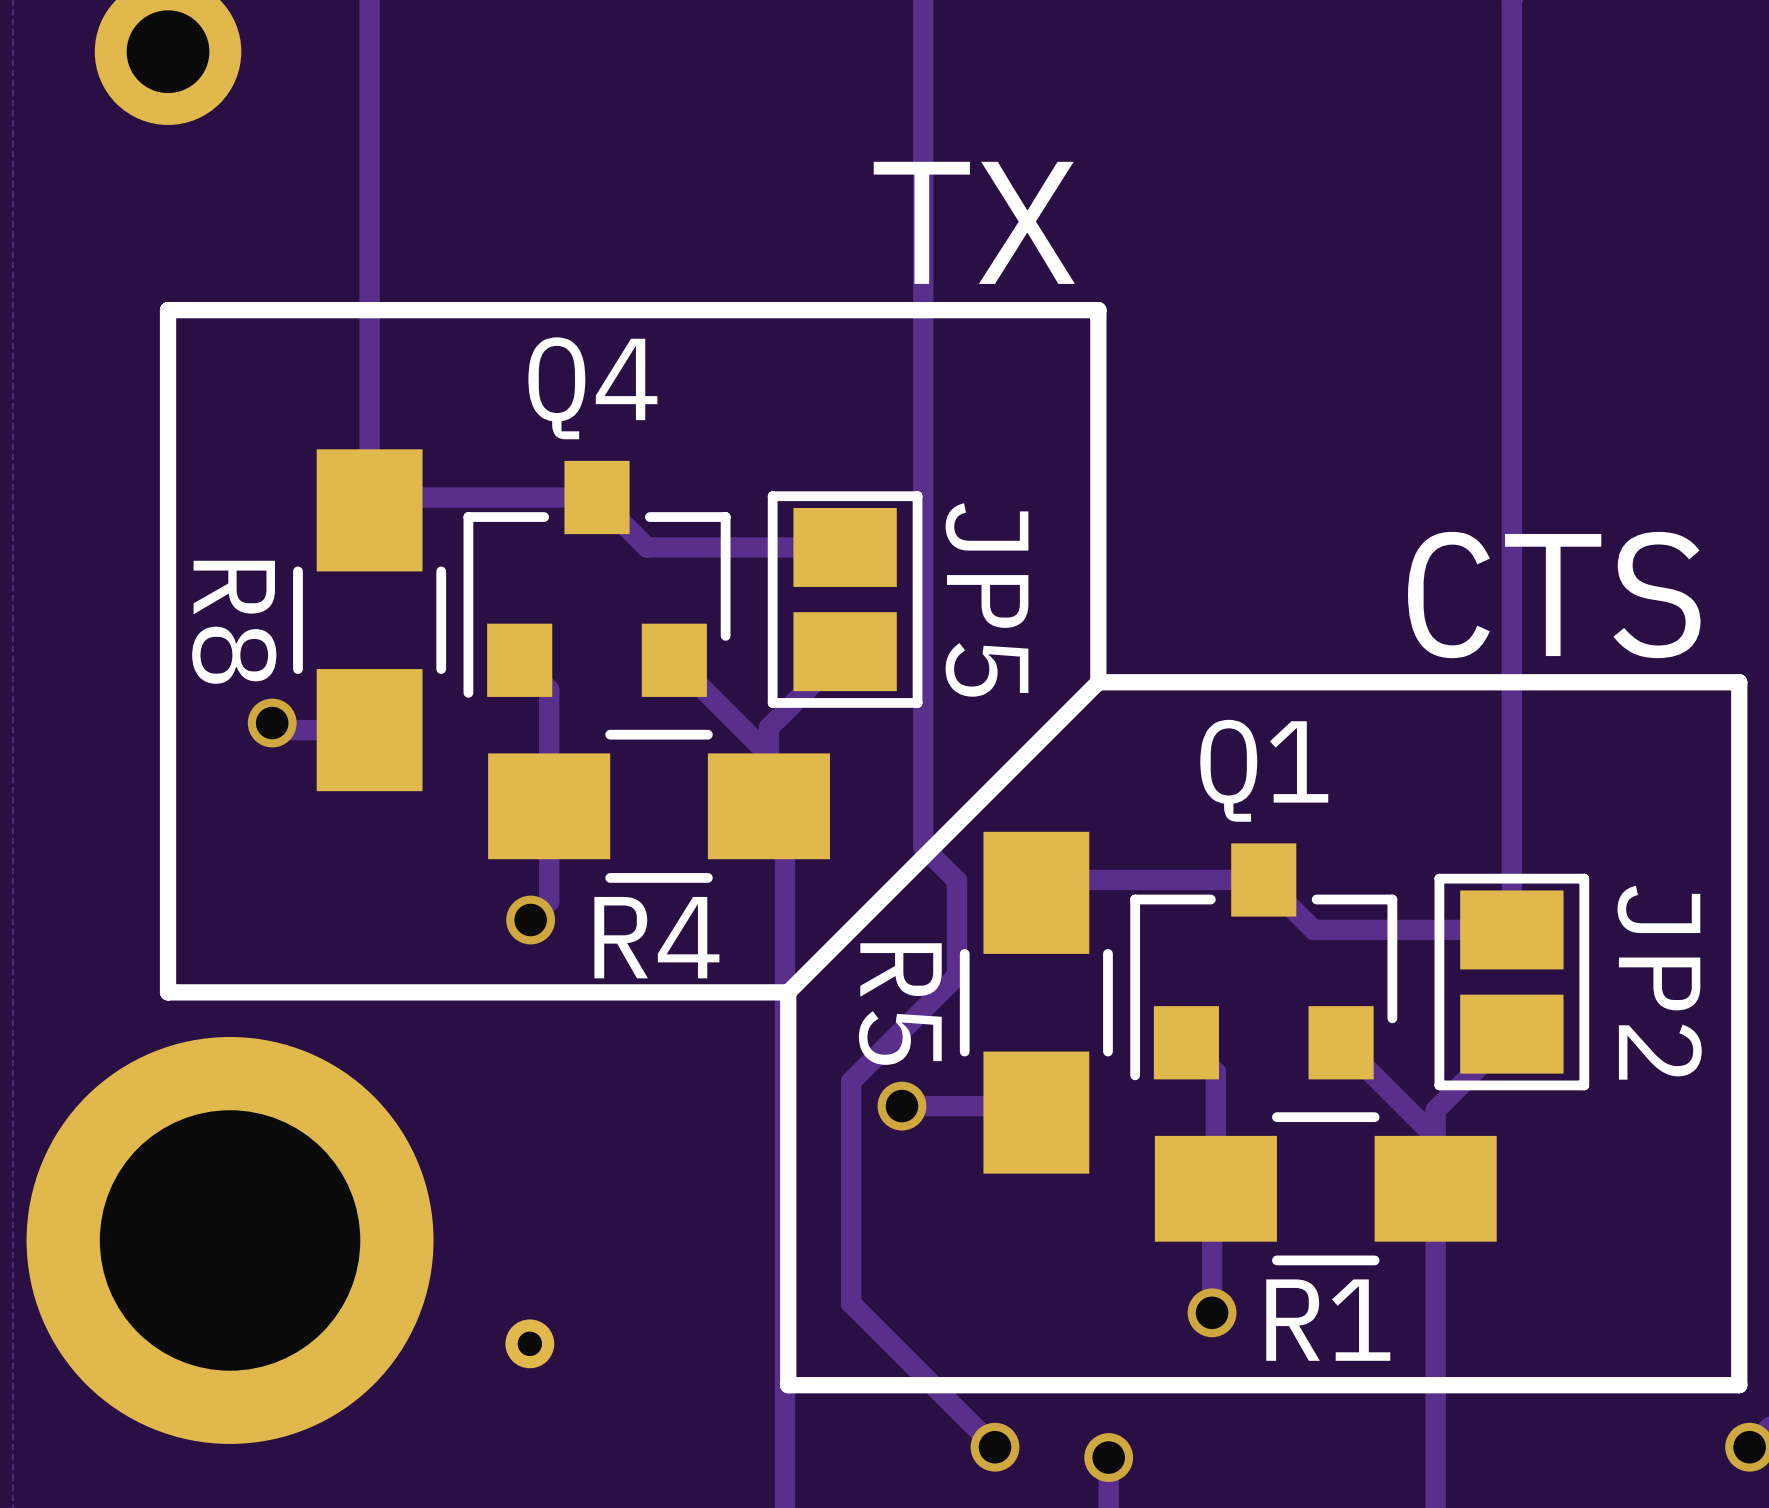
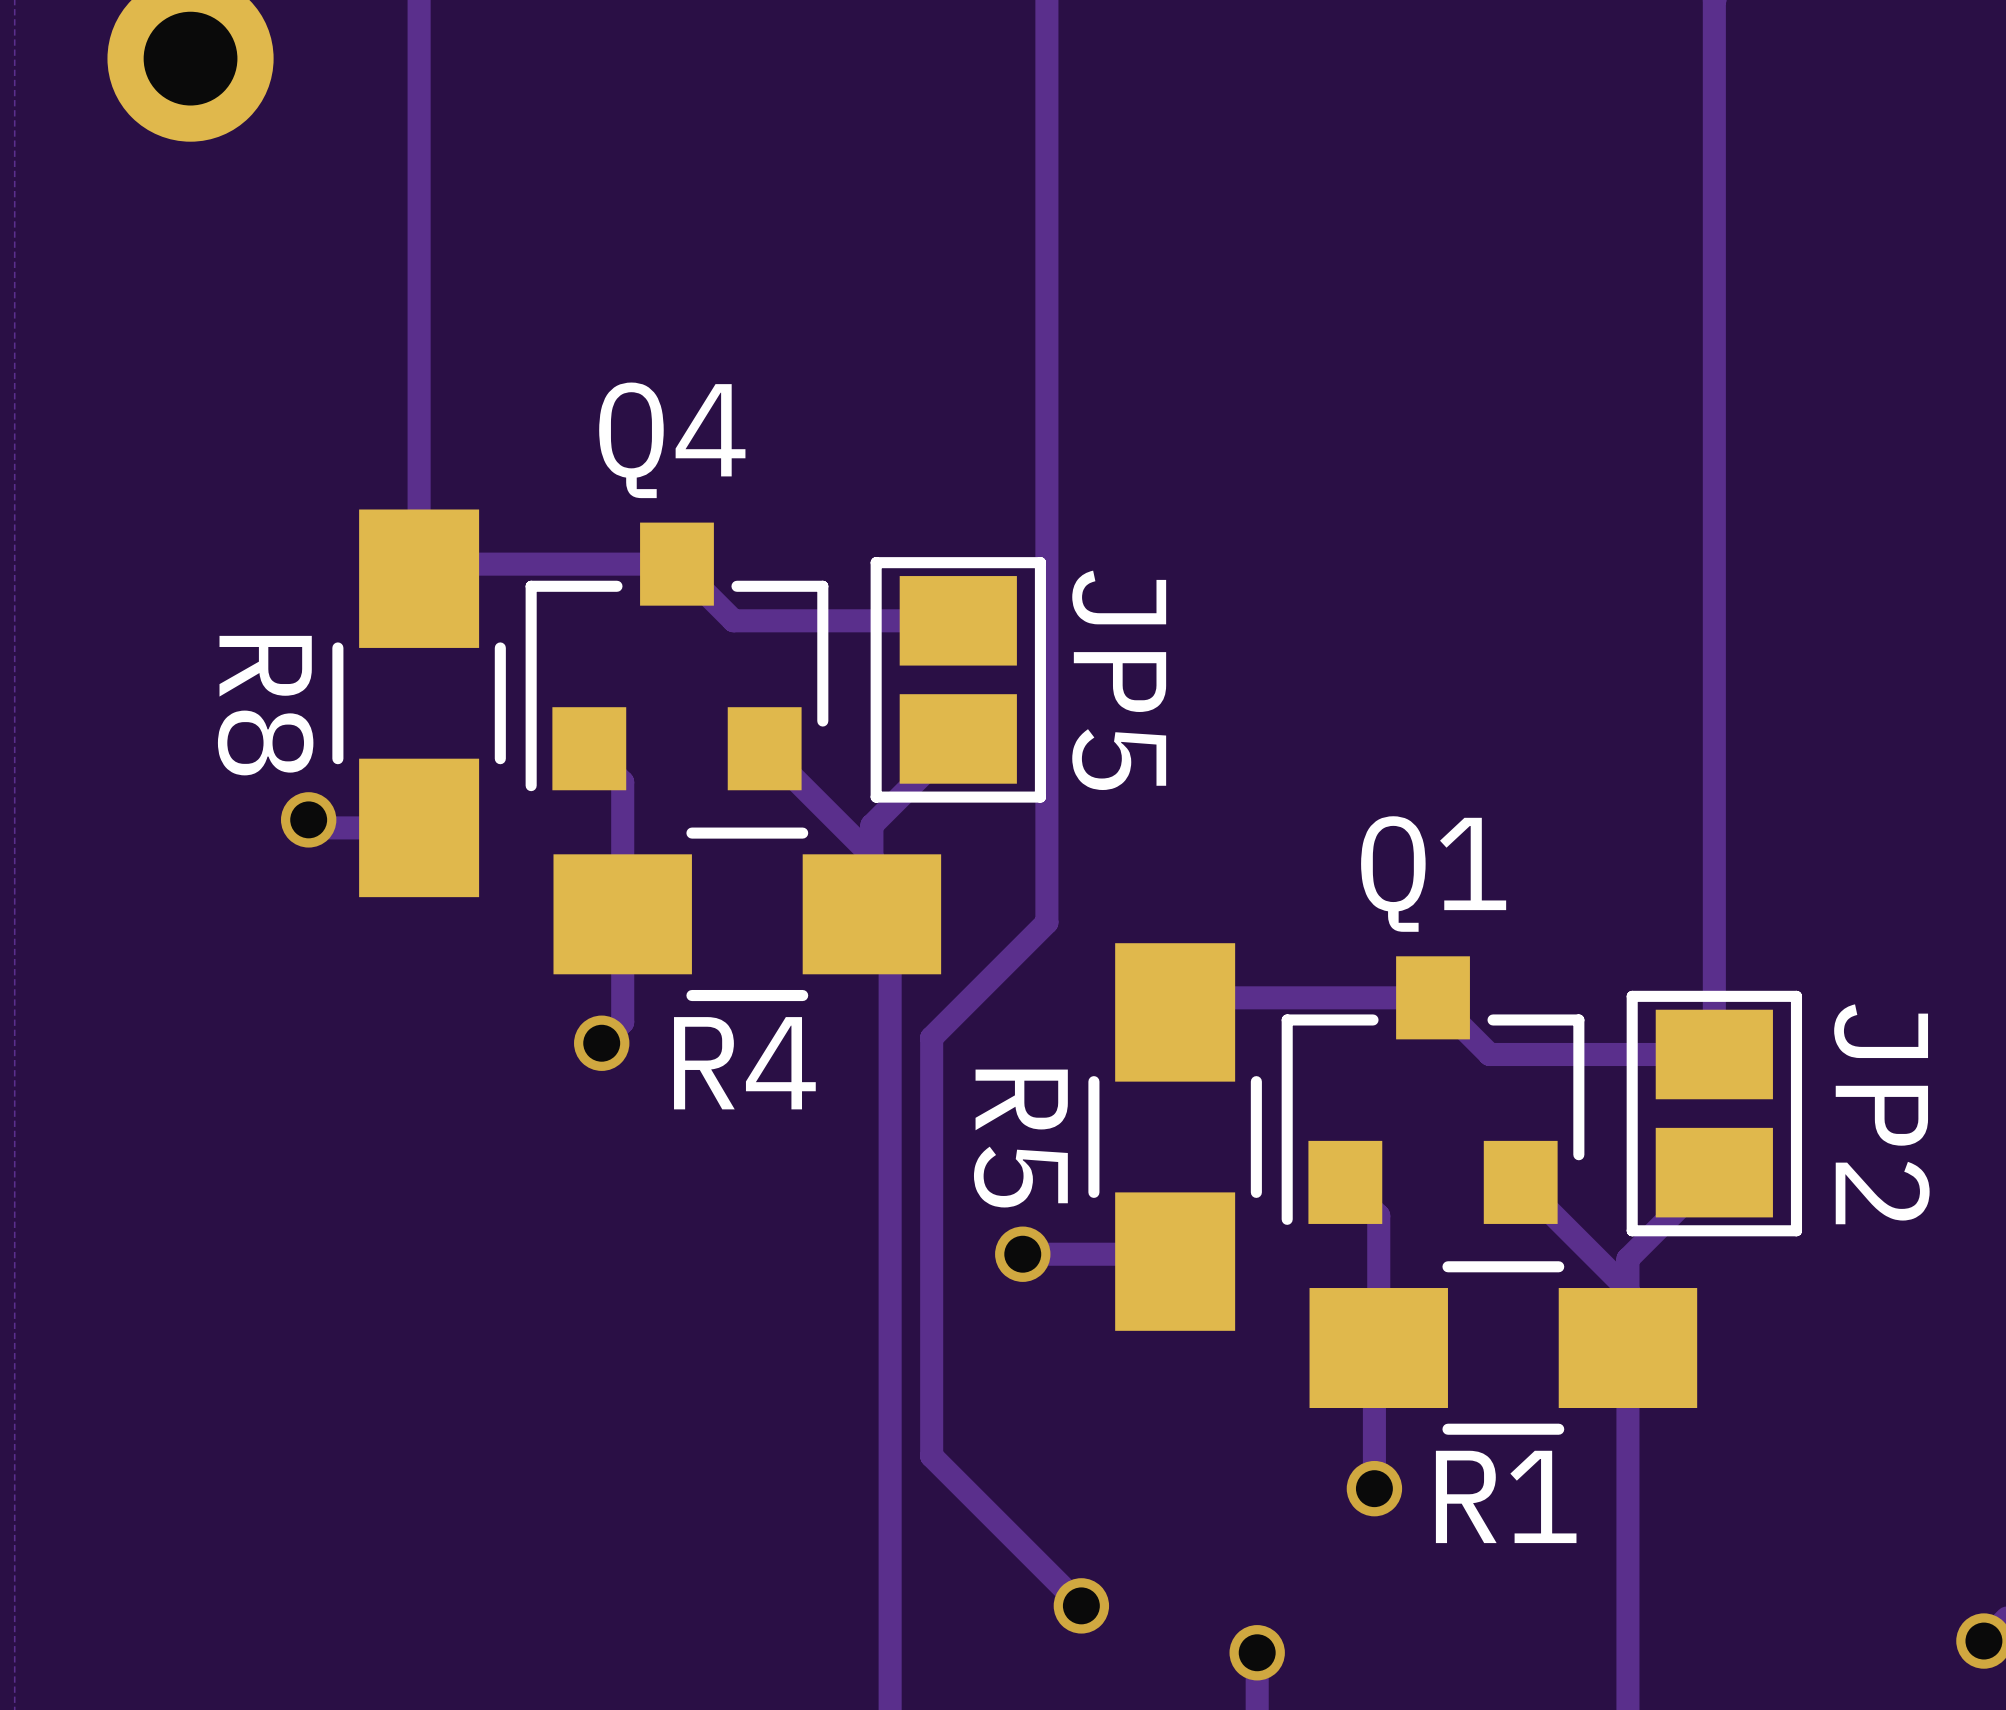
text: TX (974, 222) -> none
text: CTS (1554, 595) -> none
line: (1098, 682) (1739, 682) (1739, 1385) (788, 1385) (788, 992) -> none
line: (1098, 682) (1098, 310) (168, 310) (168, 992) (788, 992) -> none
line: (1098, 682) (788, 992) -> none
track: (923, 813) (923, 847) (956, 880) (956, 975) (851, 1081) (851, 1303) (995, 1447) -> (1046, 922) (931, 1037) (931, 1456) (1081, 1605)
part: (230, 1240) -> none
part: (529, 1343) -> none
via position: (995, 1447) -> (1081, 1605)

